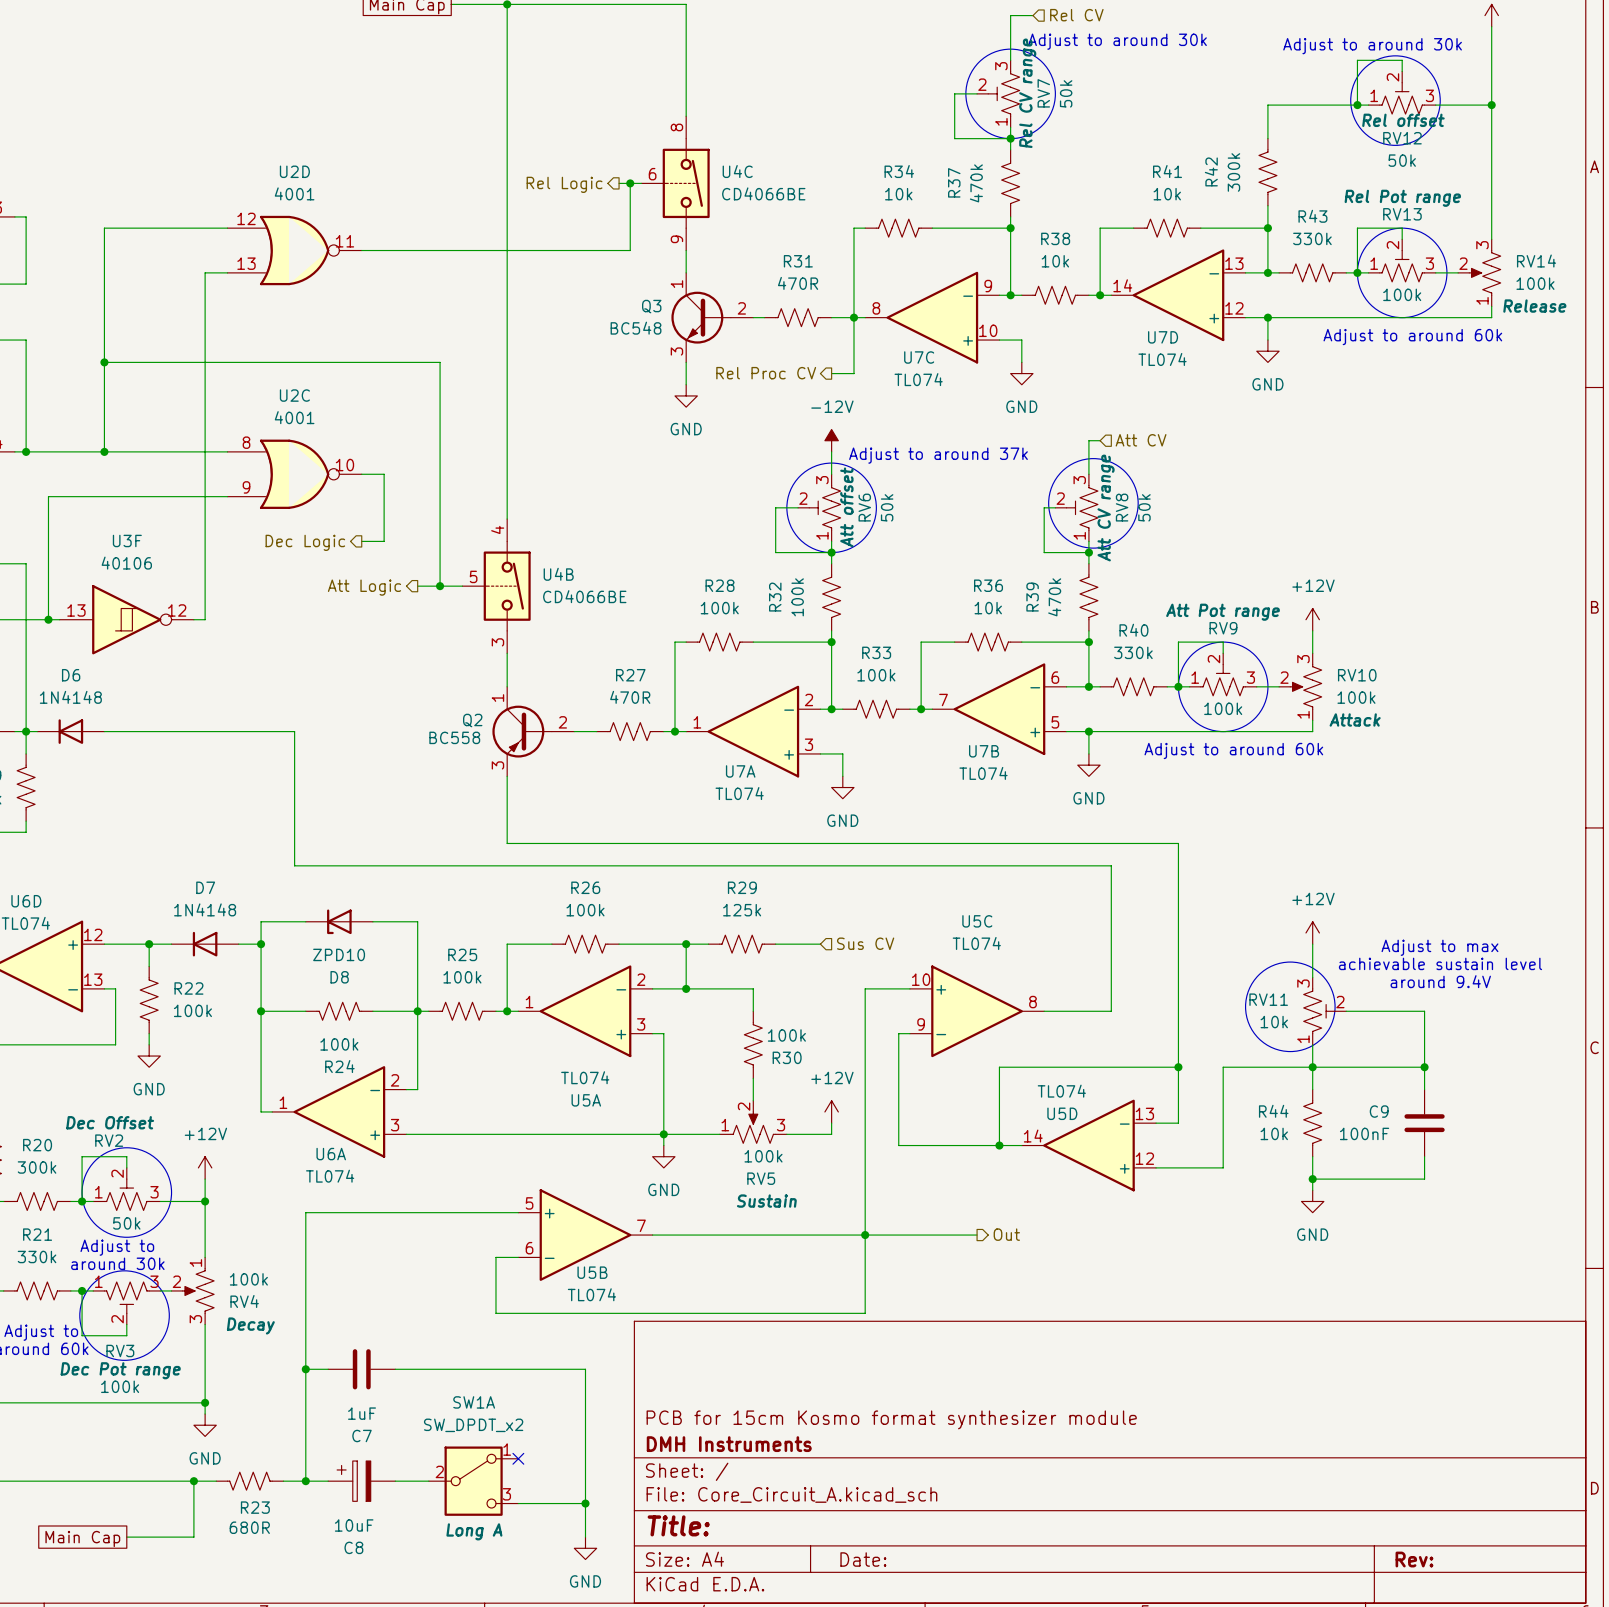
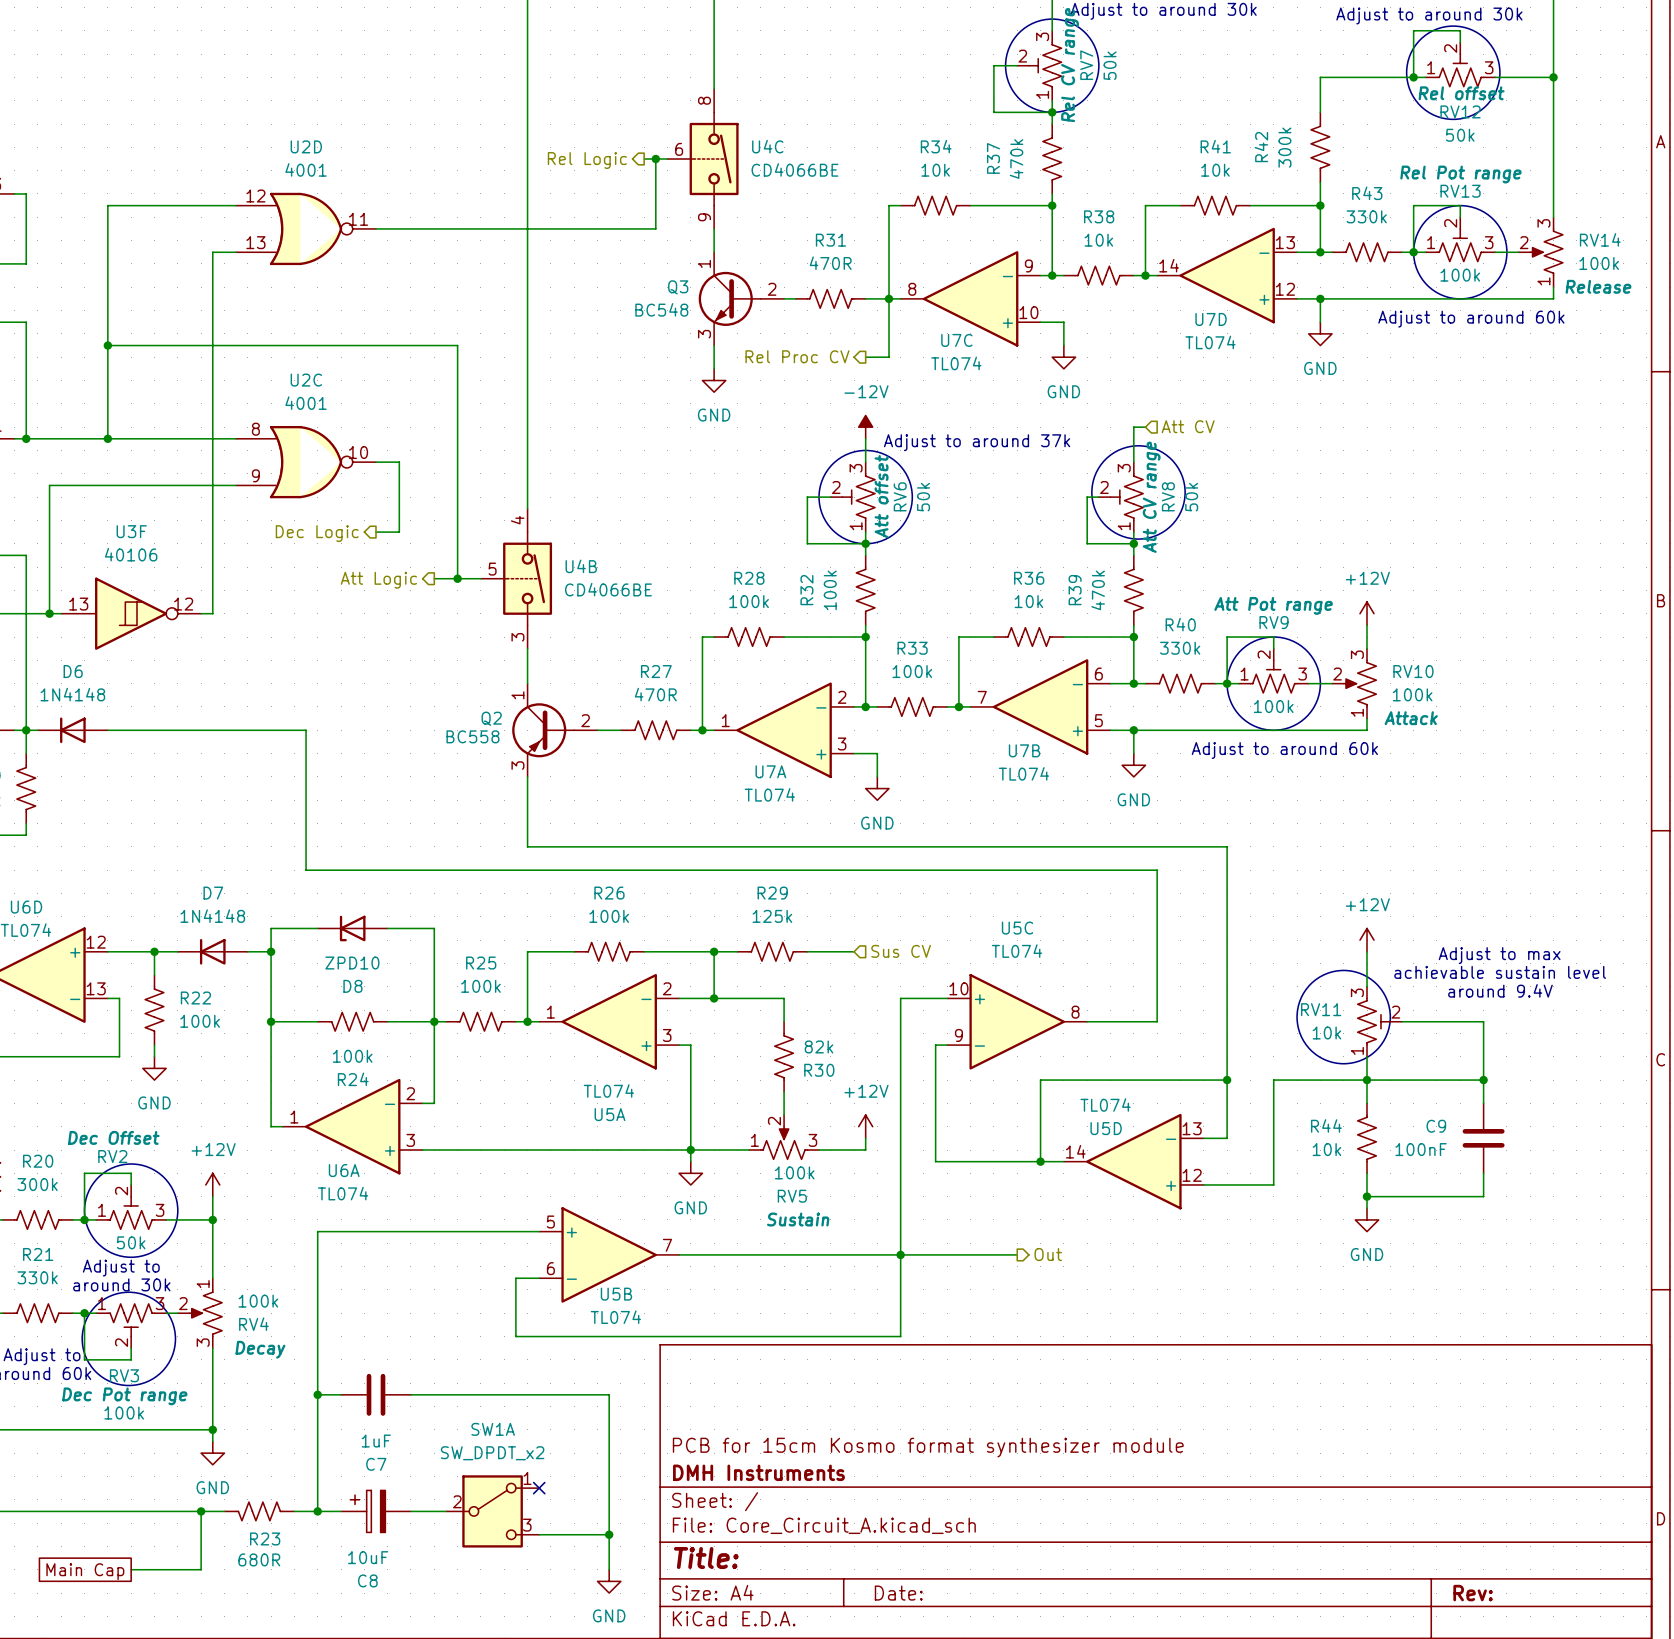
R30 value: 100k (786, 1035) -> 82k (819, 1046)
SW1A text: Long A (474, 1531) -> none

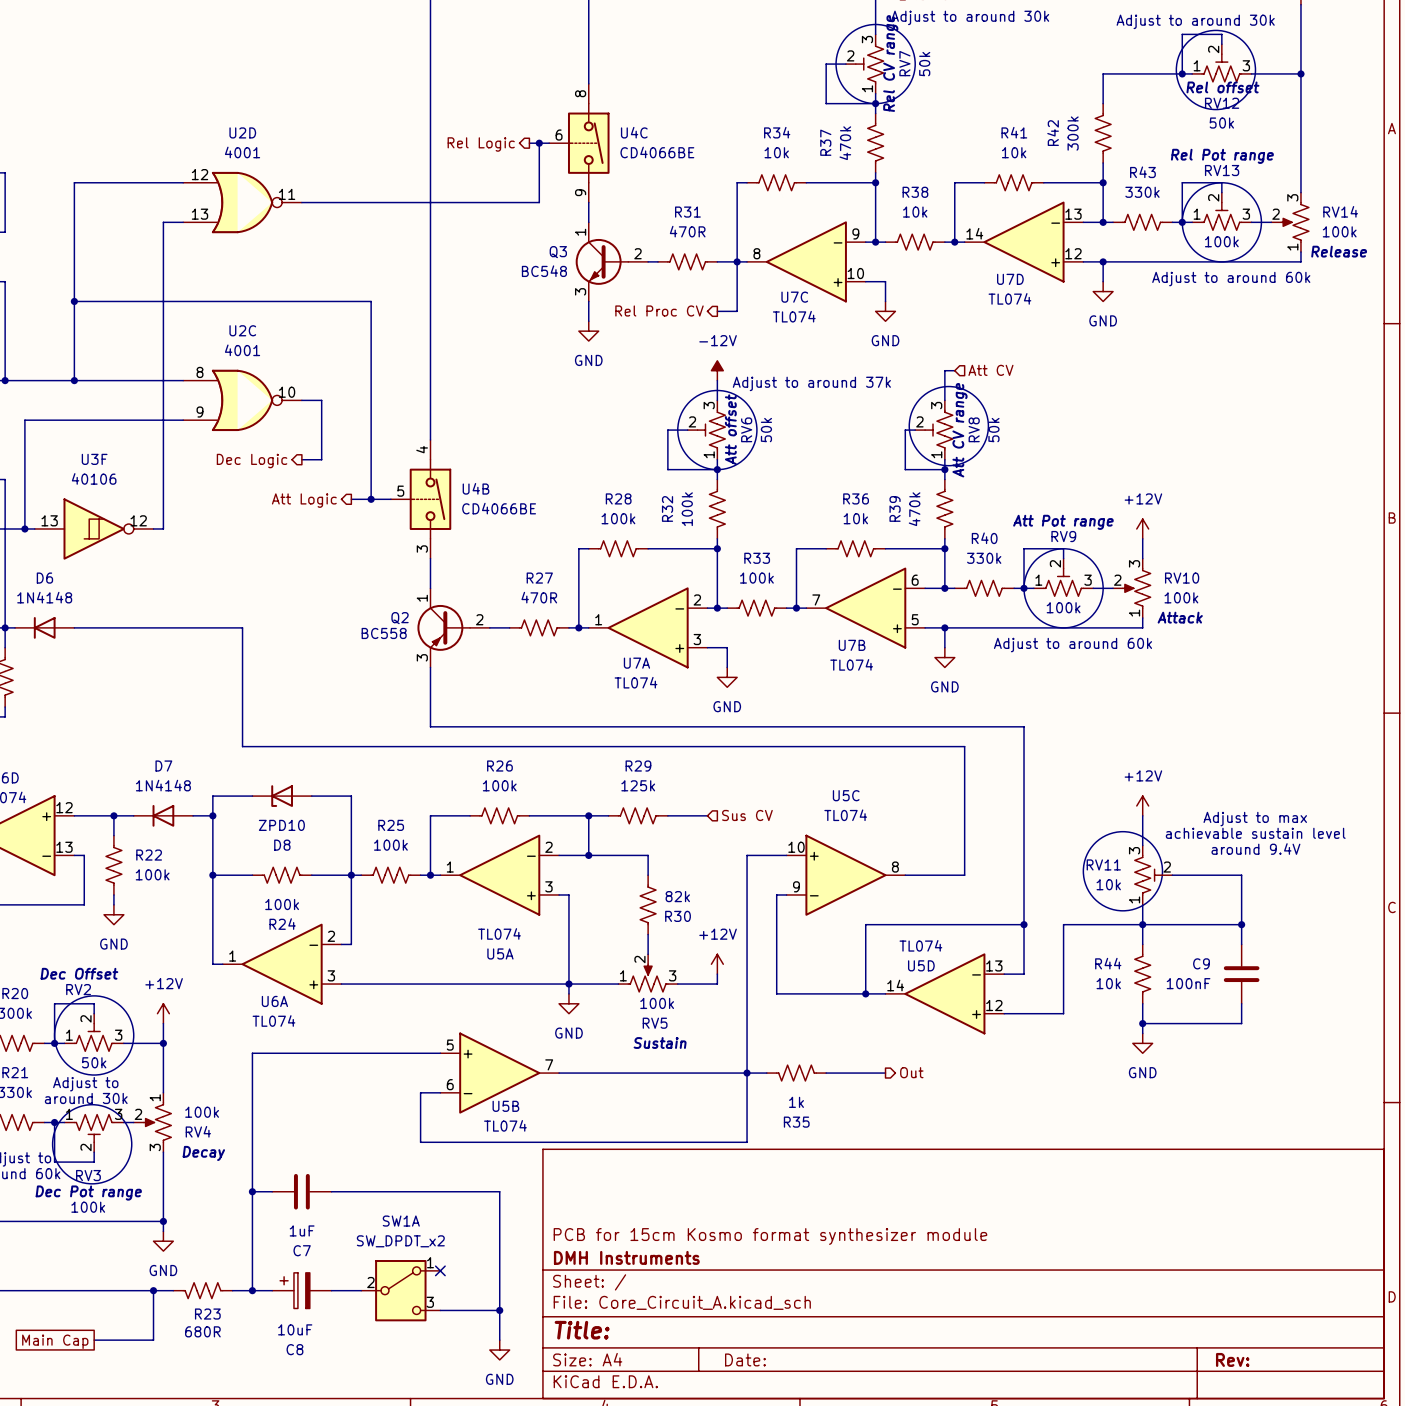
R35: none -> 1k (796, 1073)
wire: none -> (845, 1073) (885, 1073)
hierarchical label position: Out (1048, 1254) -> Out (911, 1072)

